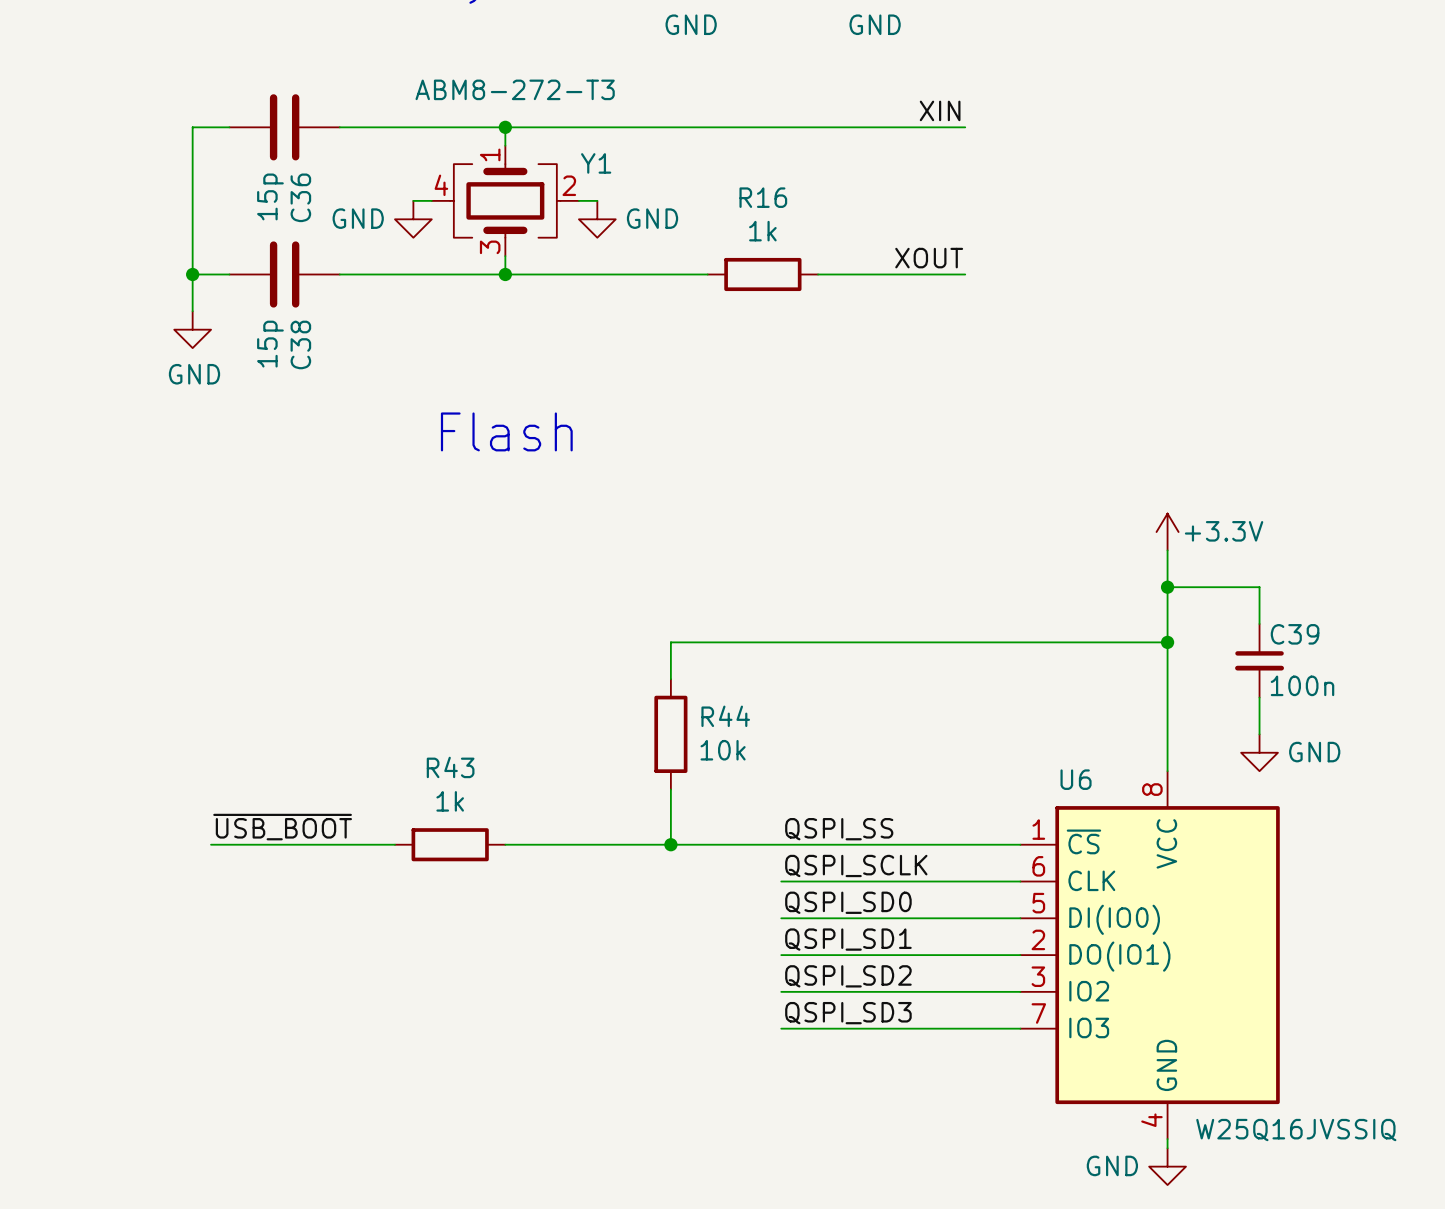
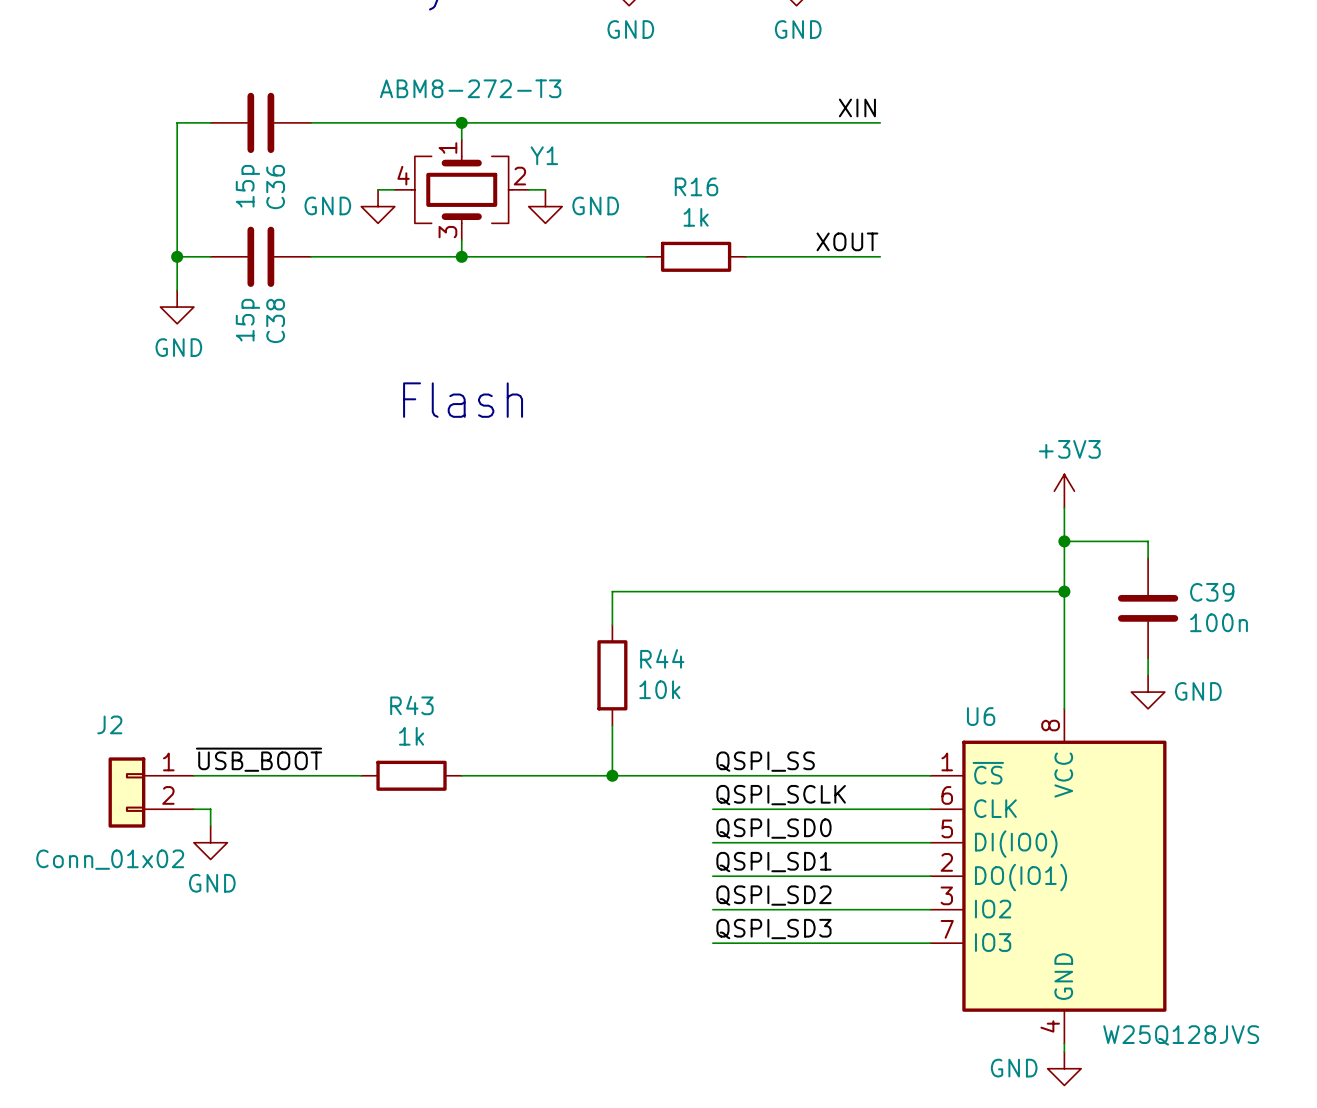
power symbol: +3.3V (1167, 532) -> +3V3 (1064, 491)
C39 symbol: [1235, 623, 1285, 698] -> [1117, 558, 1179, 659]
C39 name position: C39 (1295, 634) -> C39 (1212, 592)
C39 value position: 100n (1302, 685) -> 100n (1219, 622)
J2: none -> Conn_01x02 (151, 792)
wire: none -> (193, 809) (210, 809) (210, 825)
power symbol: none -> GND (210, 842)
U6 value: W25Q16JVSSIQ (1296, 1130) -> W25Q128JVS (1181, 1035)

